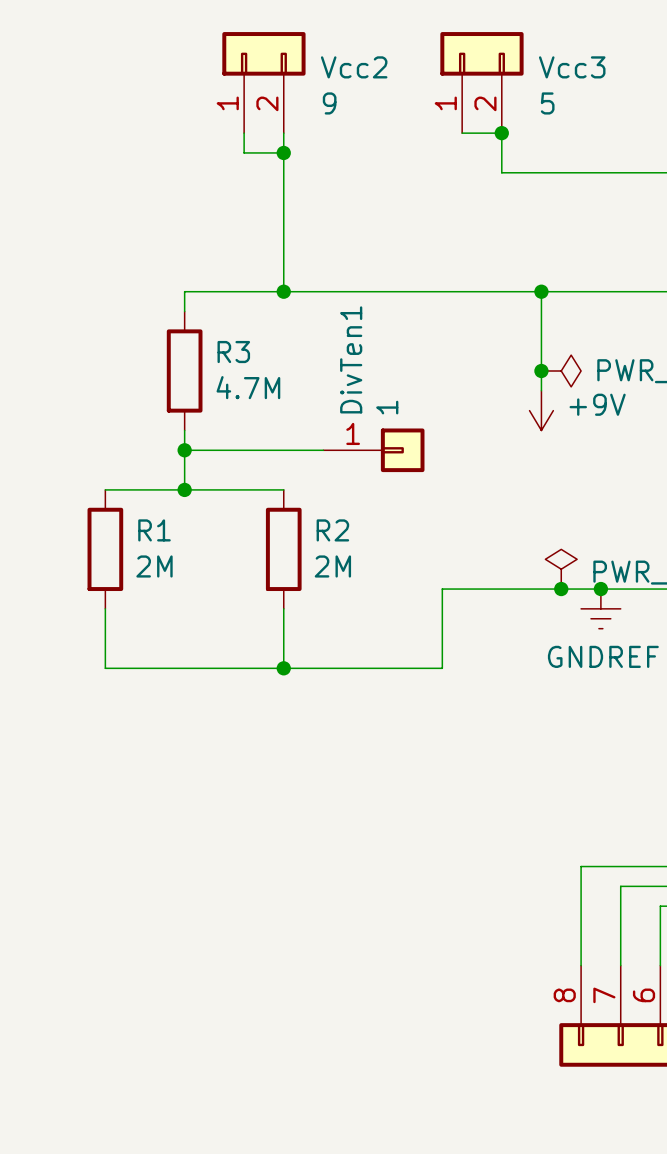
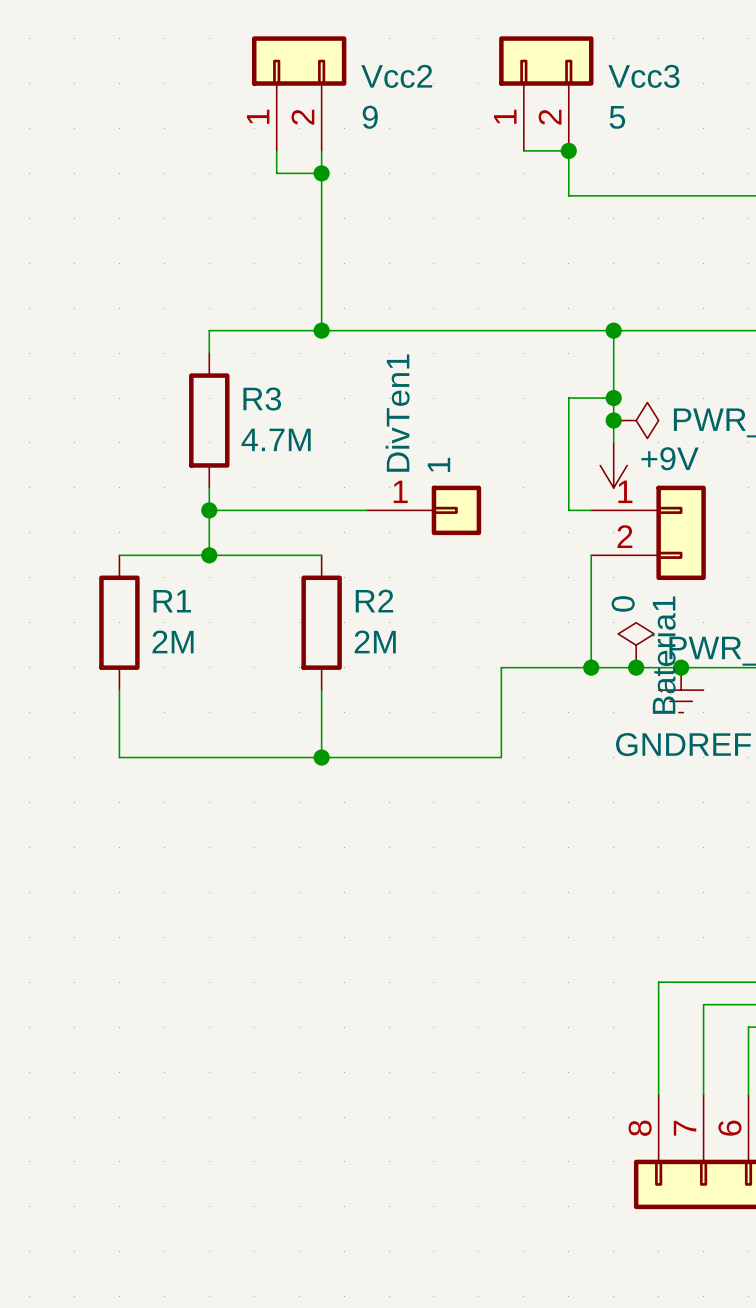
wire: none -> (613, 398) (568, 398) (568, 510) (591, 510)
junction: none -> (613, 398)
Bateria1: none -> 0 (648, 532)
wire: none -> (591, 555) (591, 667)
junction: none -> (591, 667)

